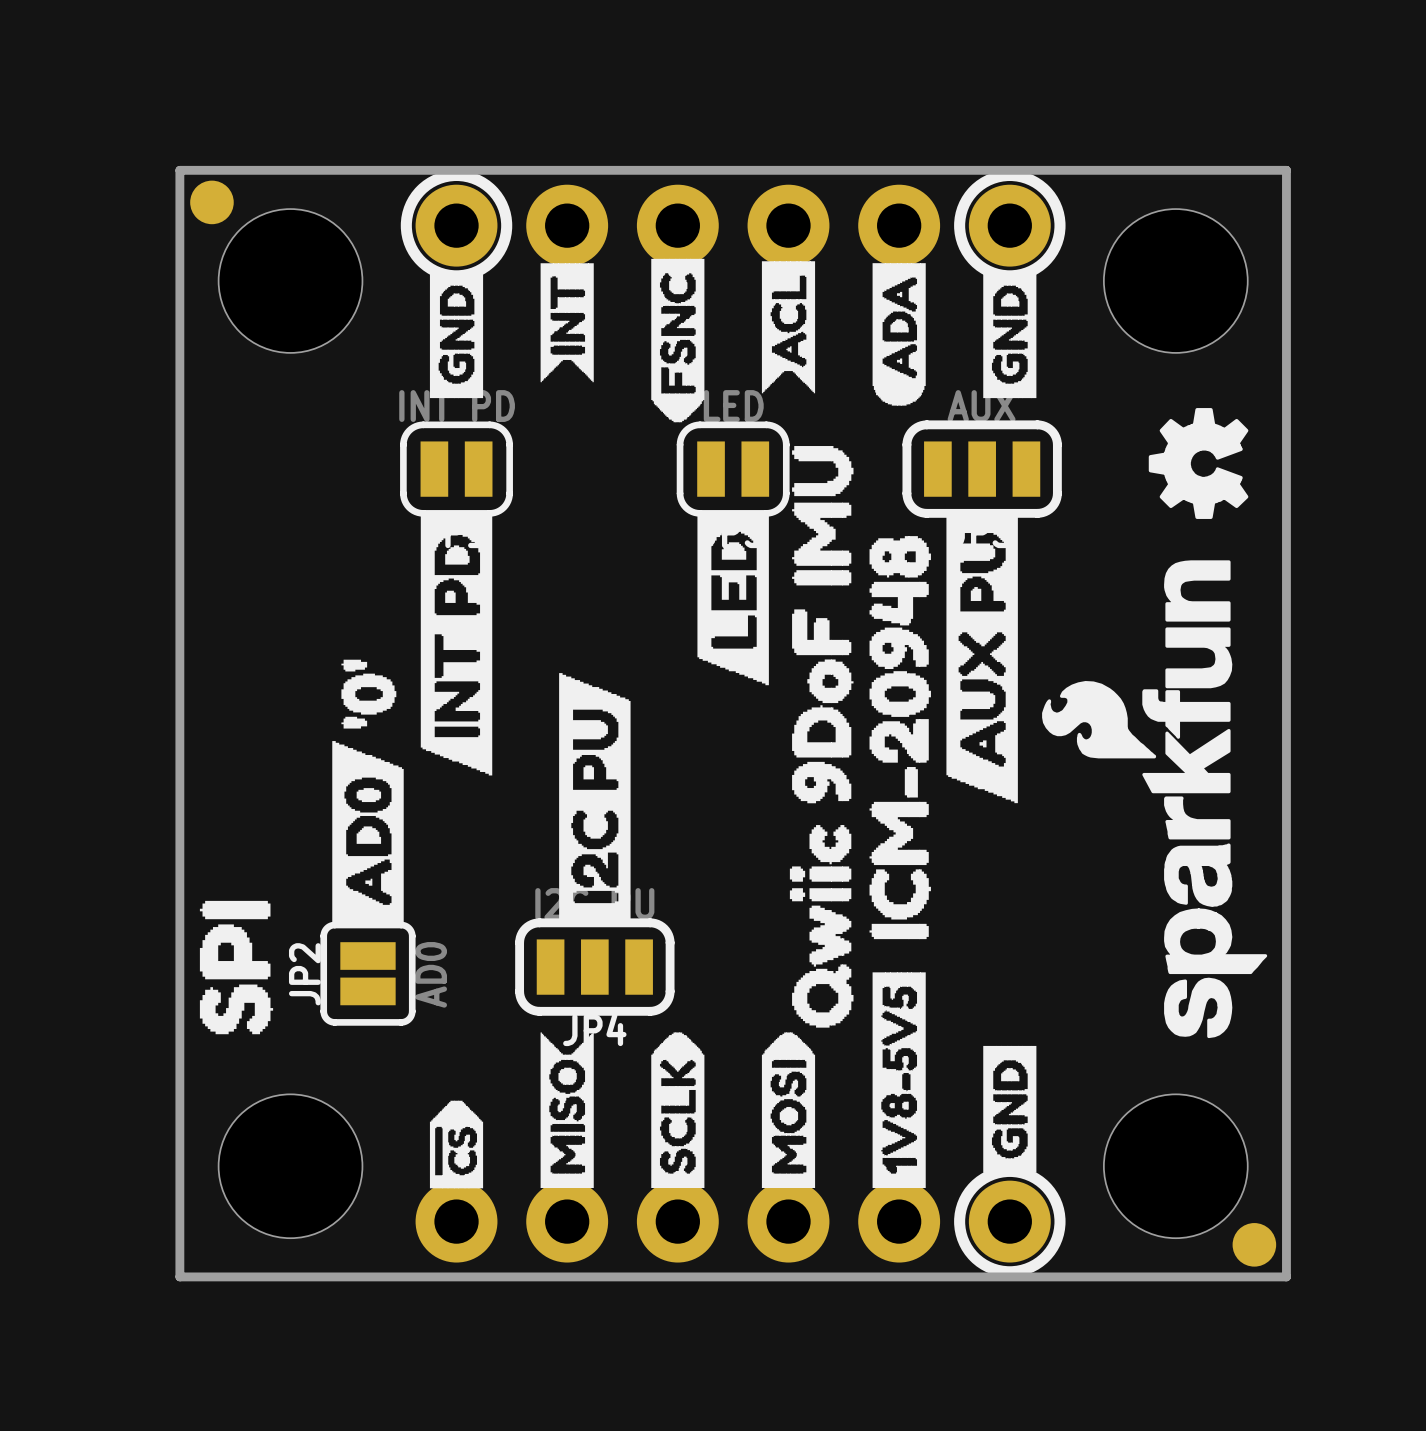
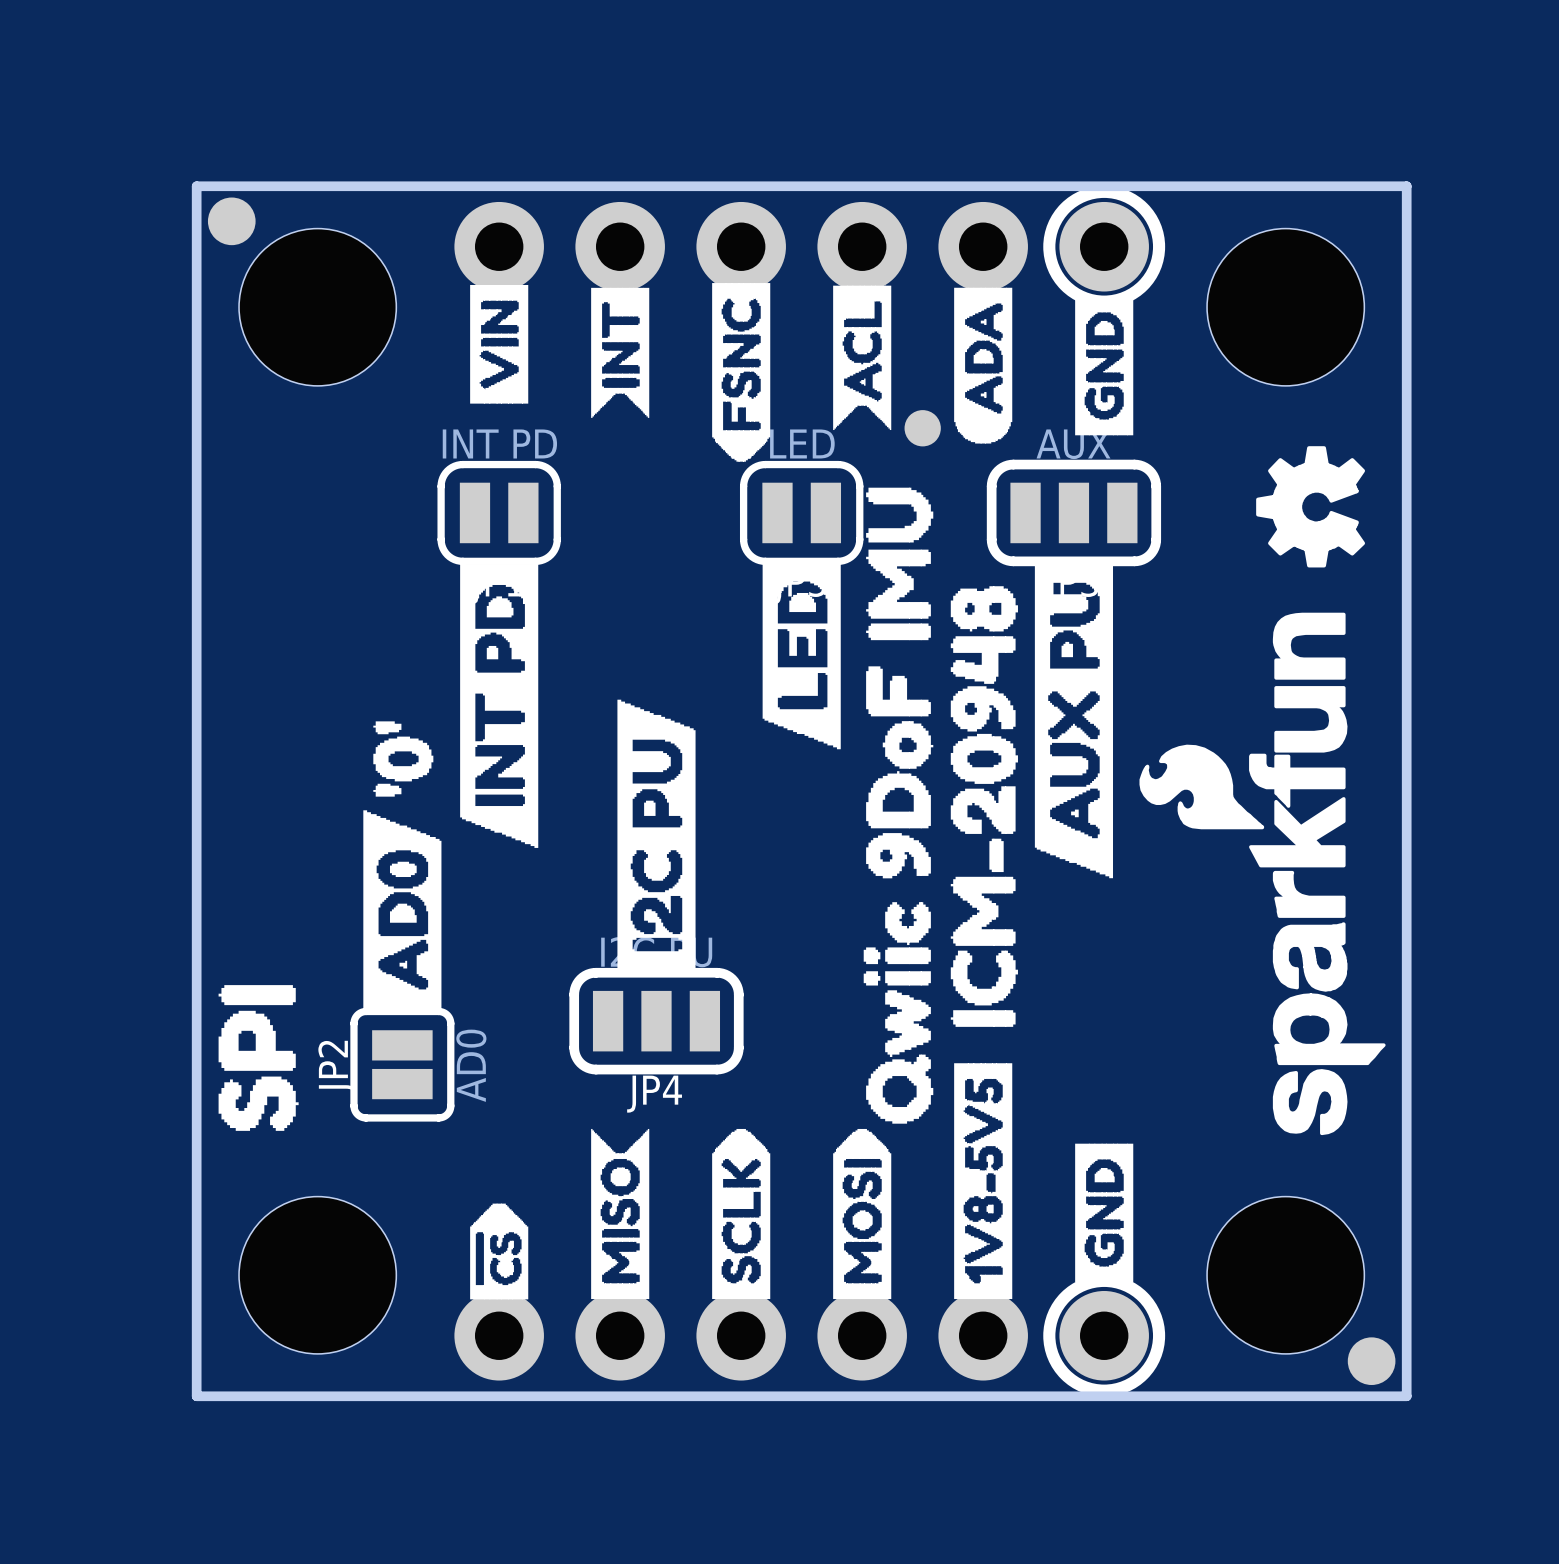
drawing: [400, 169, 513, 282] -> none
drawing shape: [429, 271, 484, 399] -> [470, 285, 529, 404]
part: none -> (922, 428)
drawing position: (594, 797) -> (656, 835)
JP4 position: (594, 967) -> (656, 1021)

